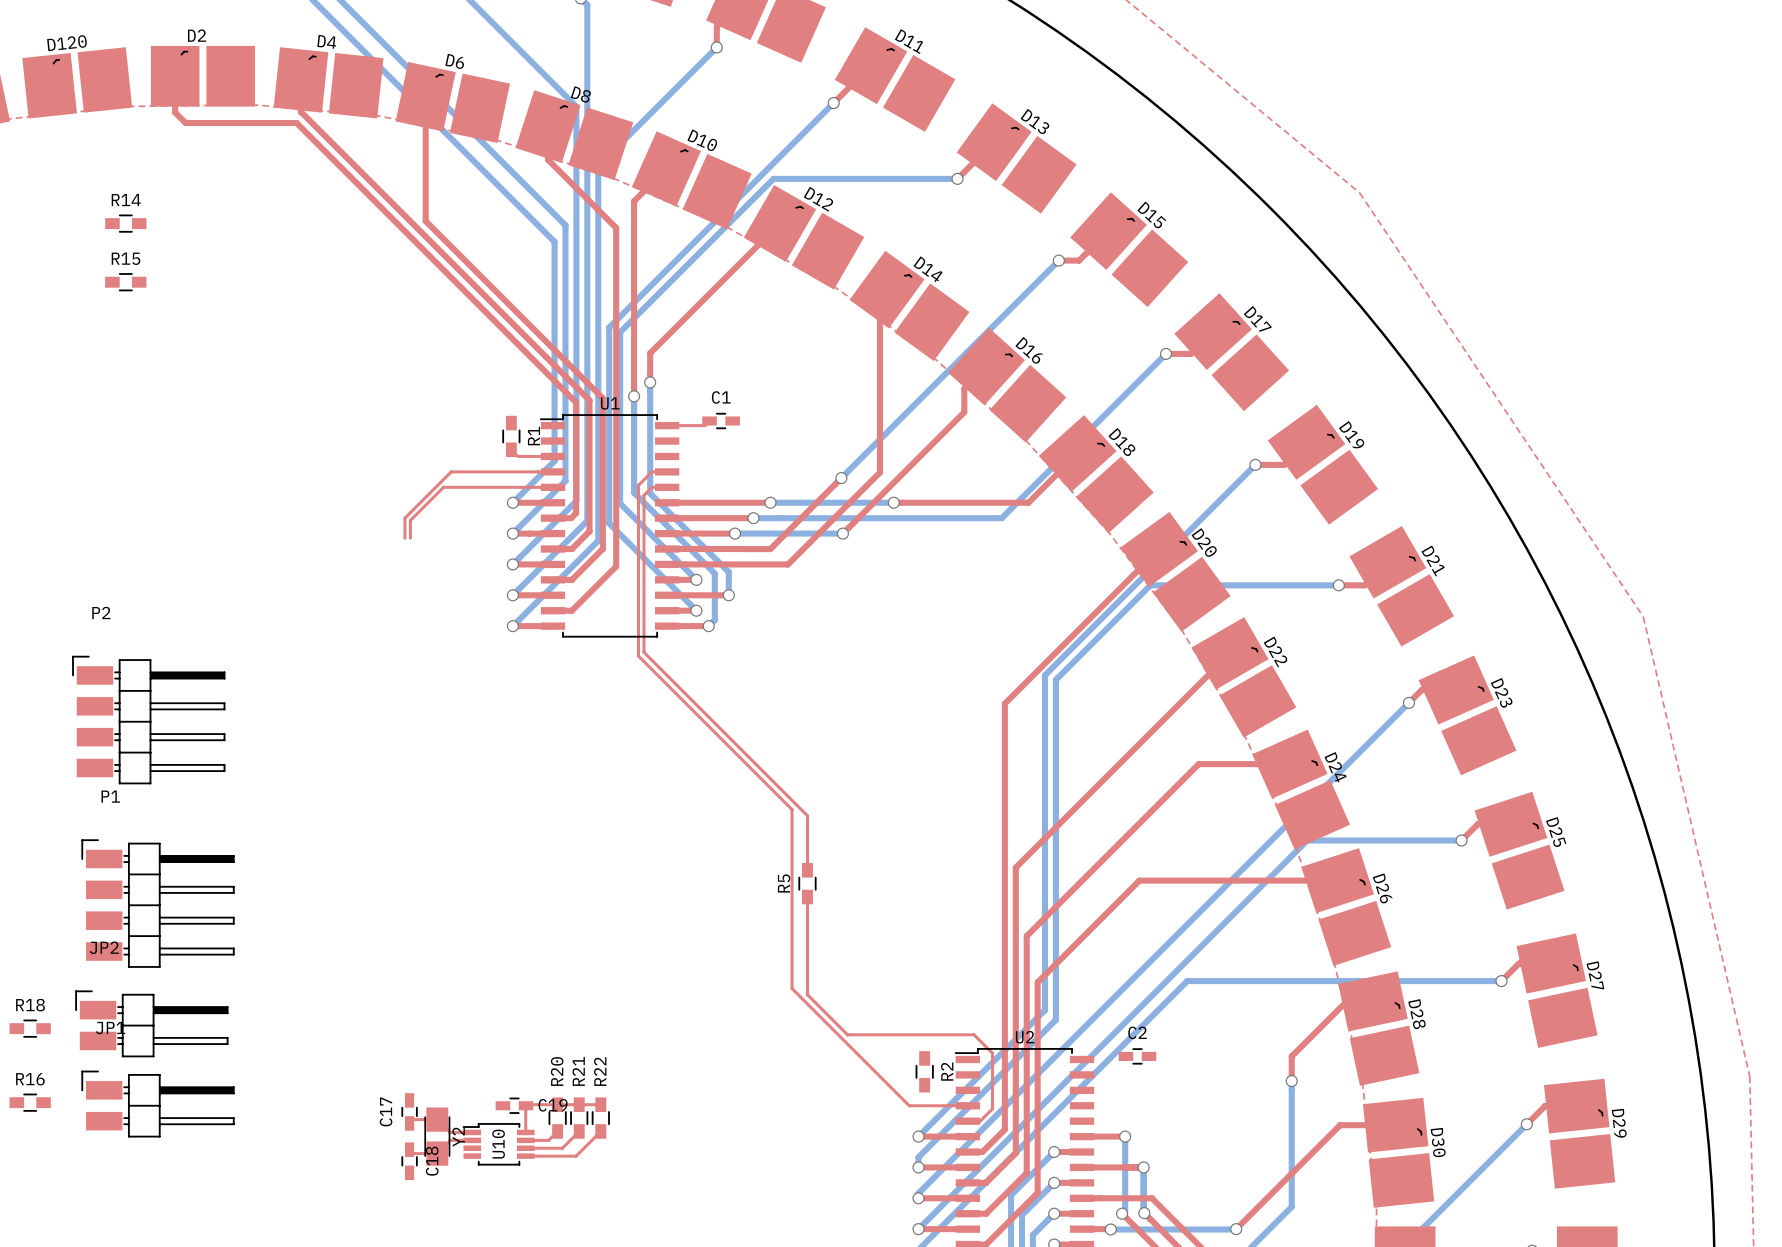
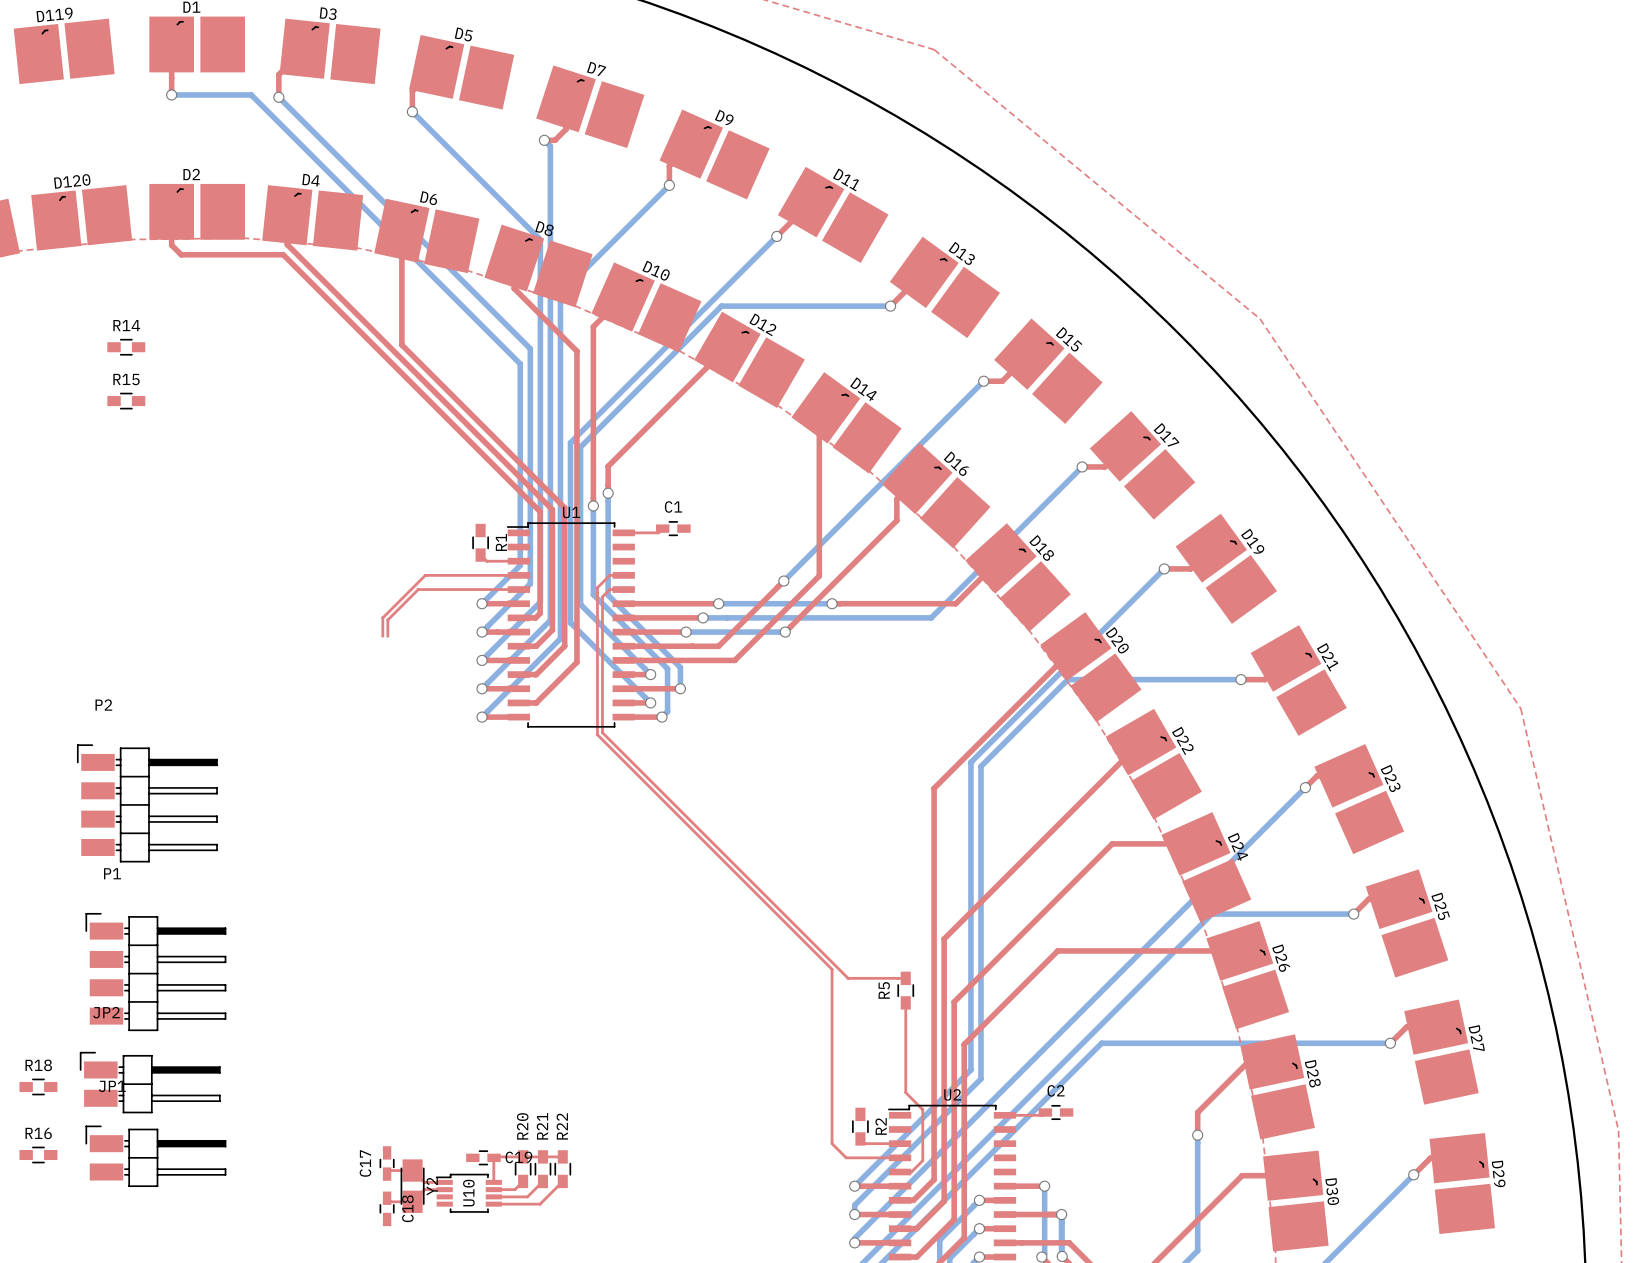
top track: (643, 643) (643, 652) (807, 815) (807, 870) -> (602, 732) (848, 978) (905, 978)
top track: (638, 645) (638, 656) (792, 809) (792, 988) (893, 1090) -> (597, 734) (832, 969) (832, 1143)
R5 position: (807, 883) -> (905, 990)
top track: (807, 897) (807, 994) (847, 1034) (974, 1034) -> (905, 1002) (905, 1092)
top track: none -> (1045, 1112) (1042, 1115) (1004, 1115)
top track: none -> (860, 1138) (865, 1143) (900, 1143)

